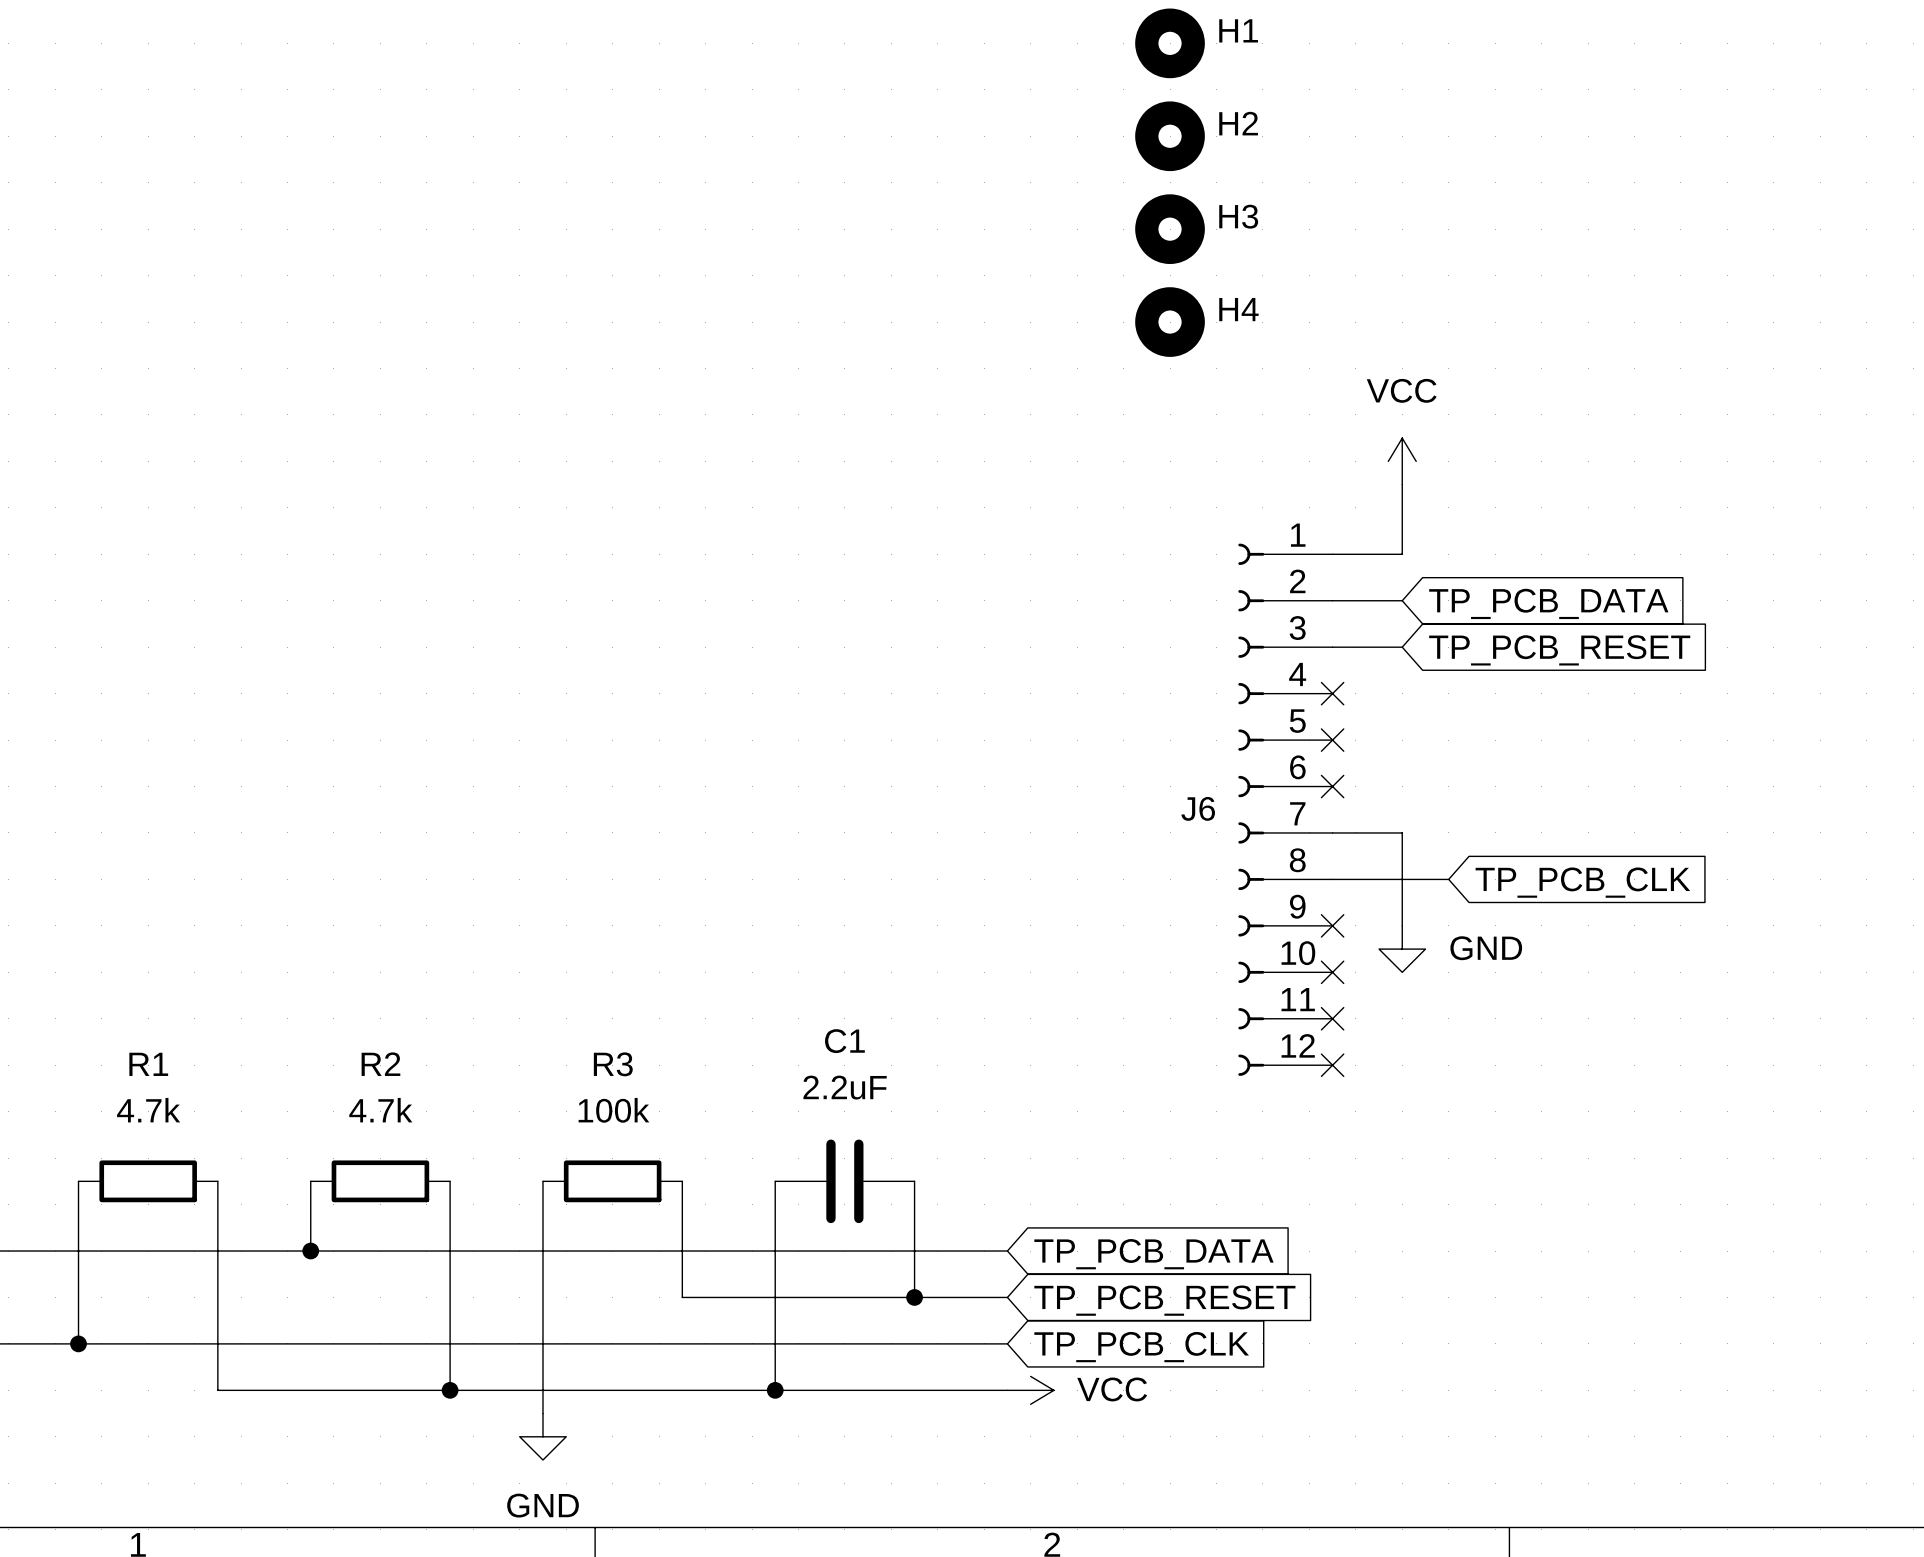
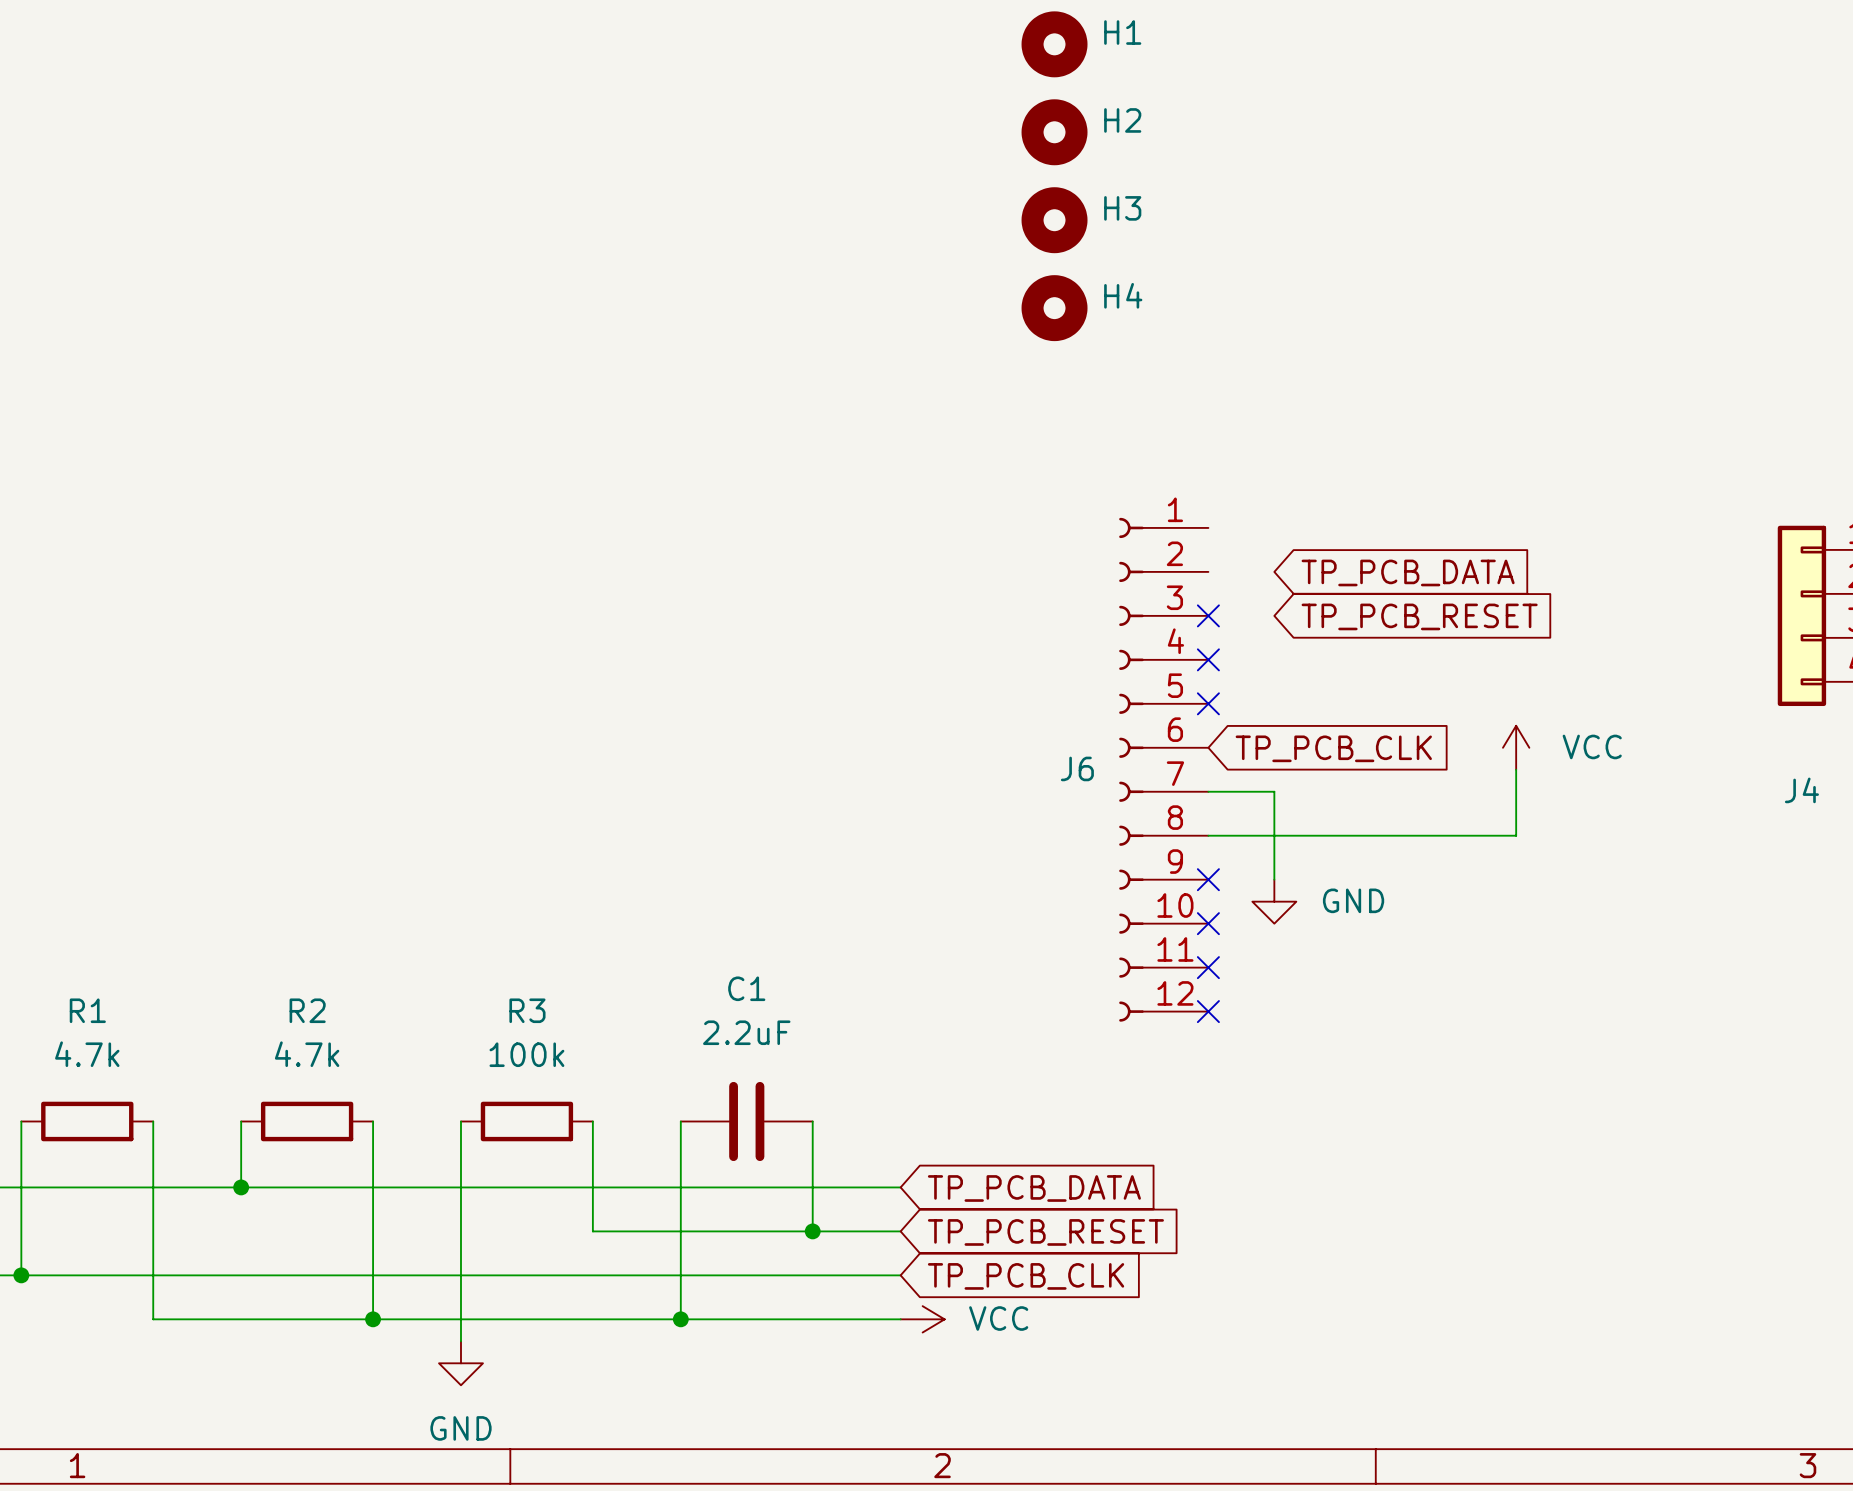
power symbol text position: VCC (1401, 390) -> VCC (1592, 746)
power symbol position: VCC (1402, 461) -> VCC (1516, 747)
wire: (1402, 484) (1402, 554) (1332, 554) -> none
wire: (1332, 600) (1402, 600) -> none
wire: (1332, 647) (1402, 647) -> none
no-connect mark: none -> (1208, 615)
no-connect mark: (1332, 786) -> none
wire: none -> (1516, 769) (1516, 835) (1318, 835)
global label position: TP_PCB_CLK (1582, 882) -> TP_PCB_CLK (1333, 748)

